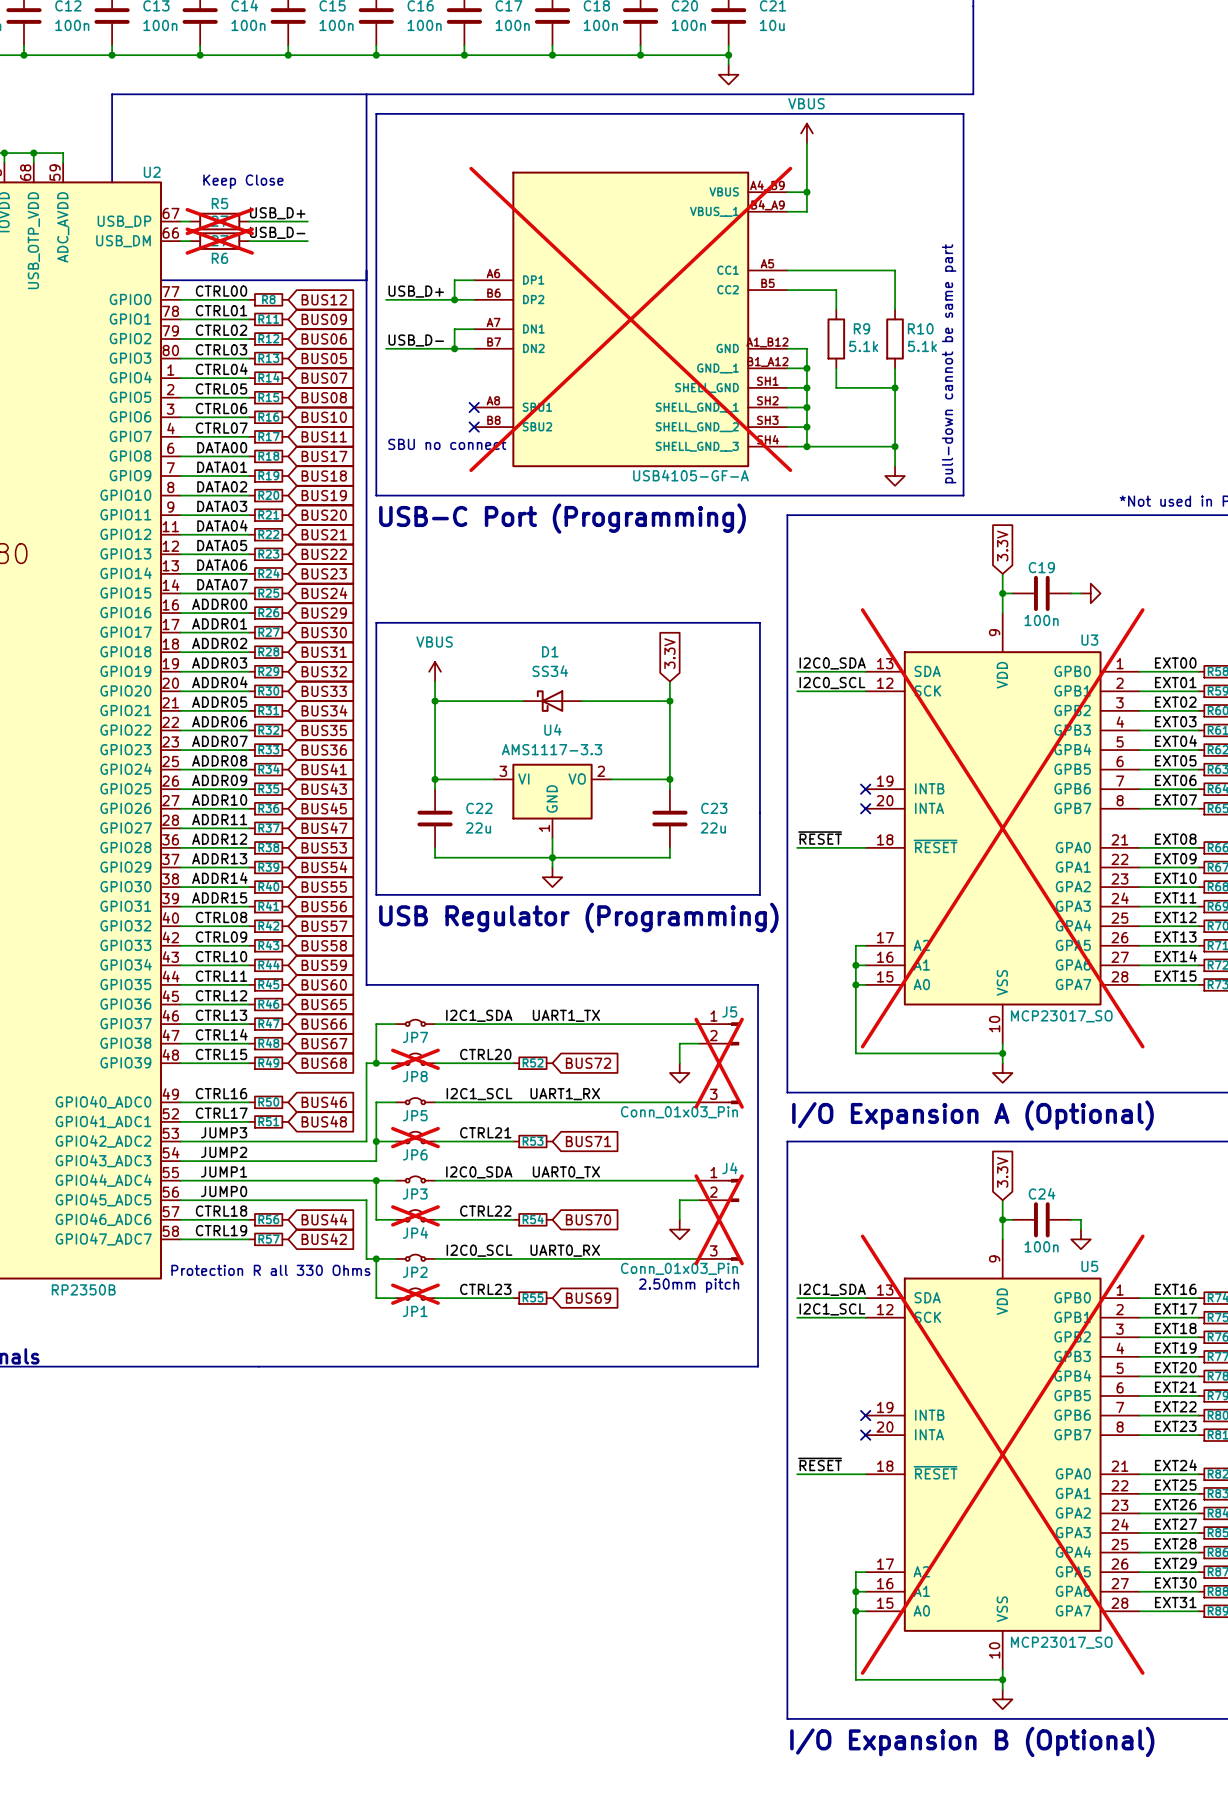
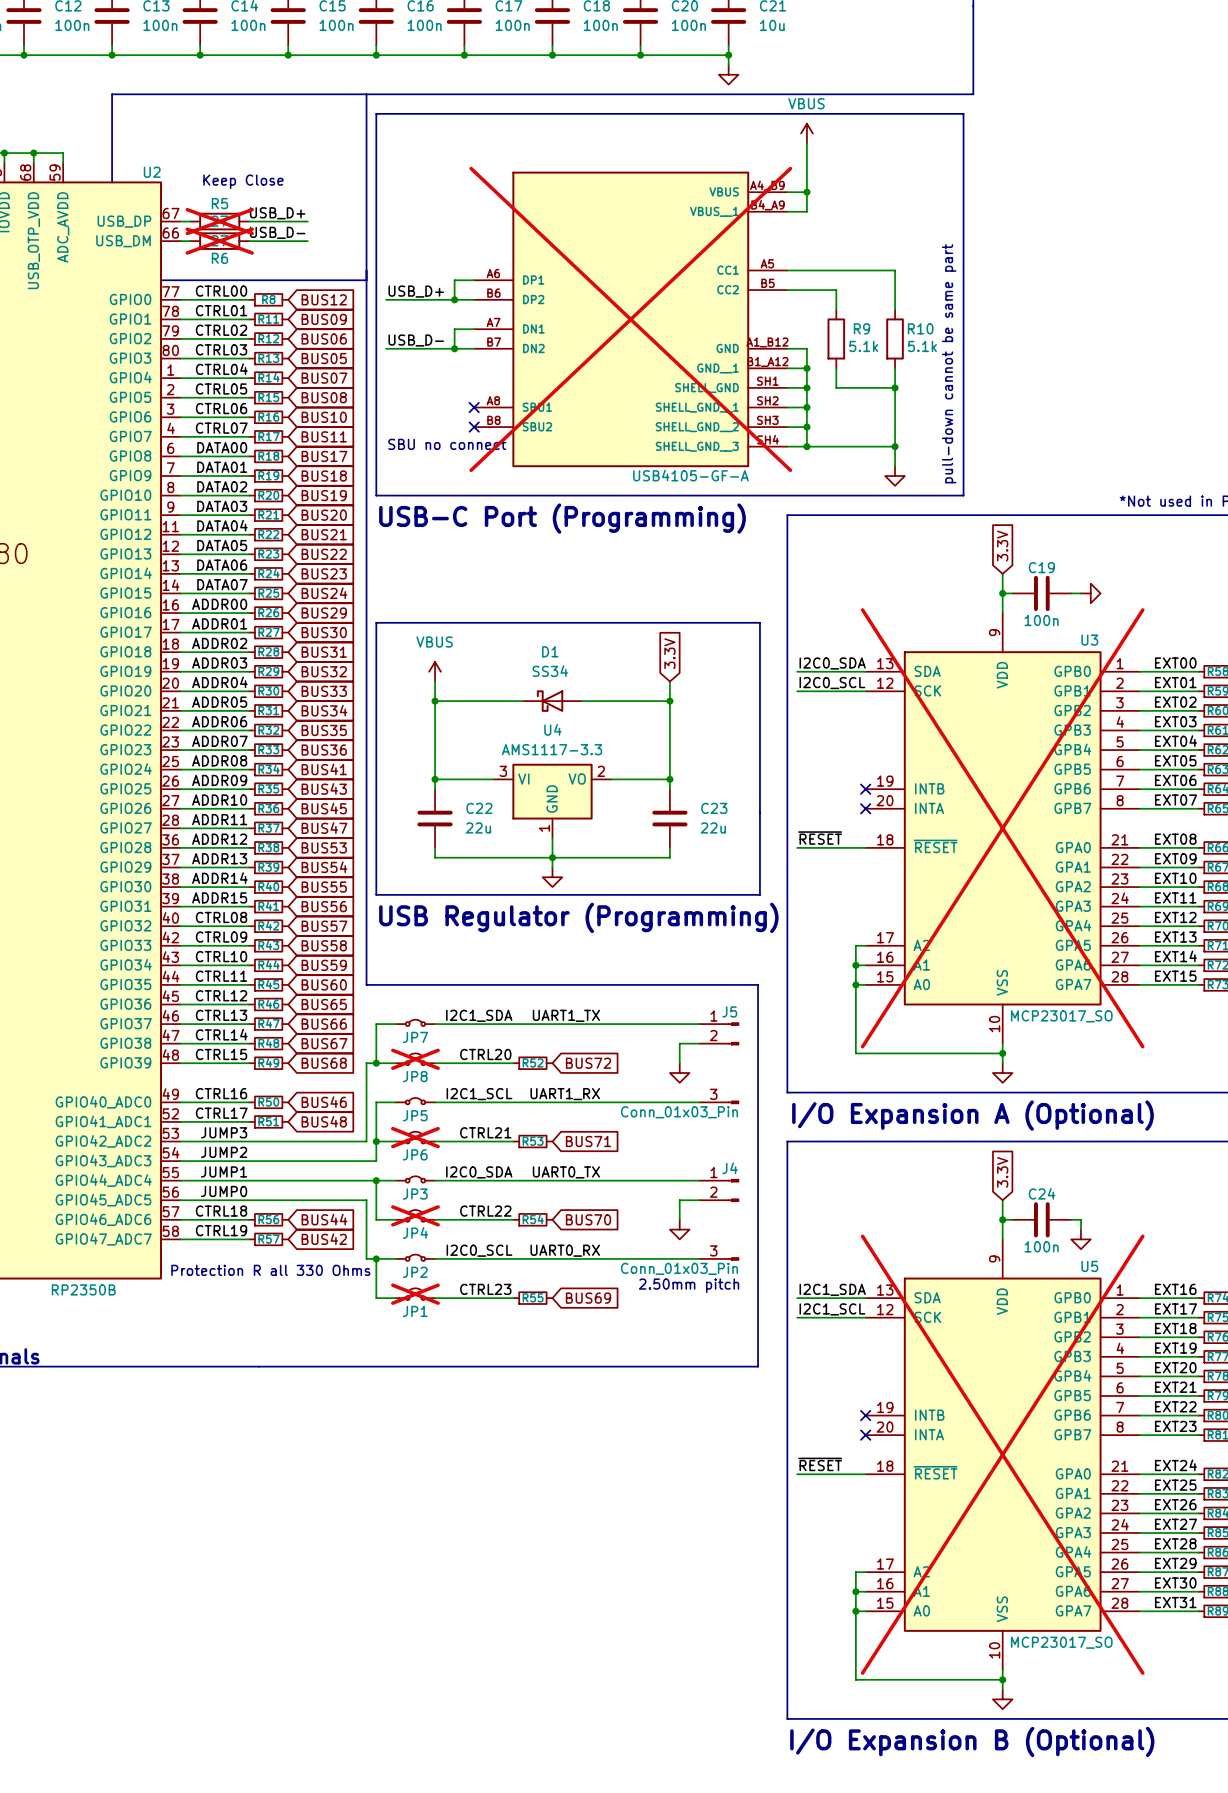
J5 do-not-place cross: (719, 1063) -> none
J4 do-not-place cross: (719, 1219) -> none

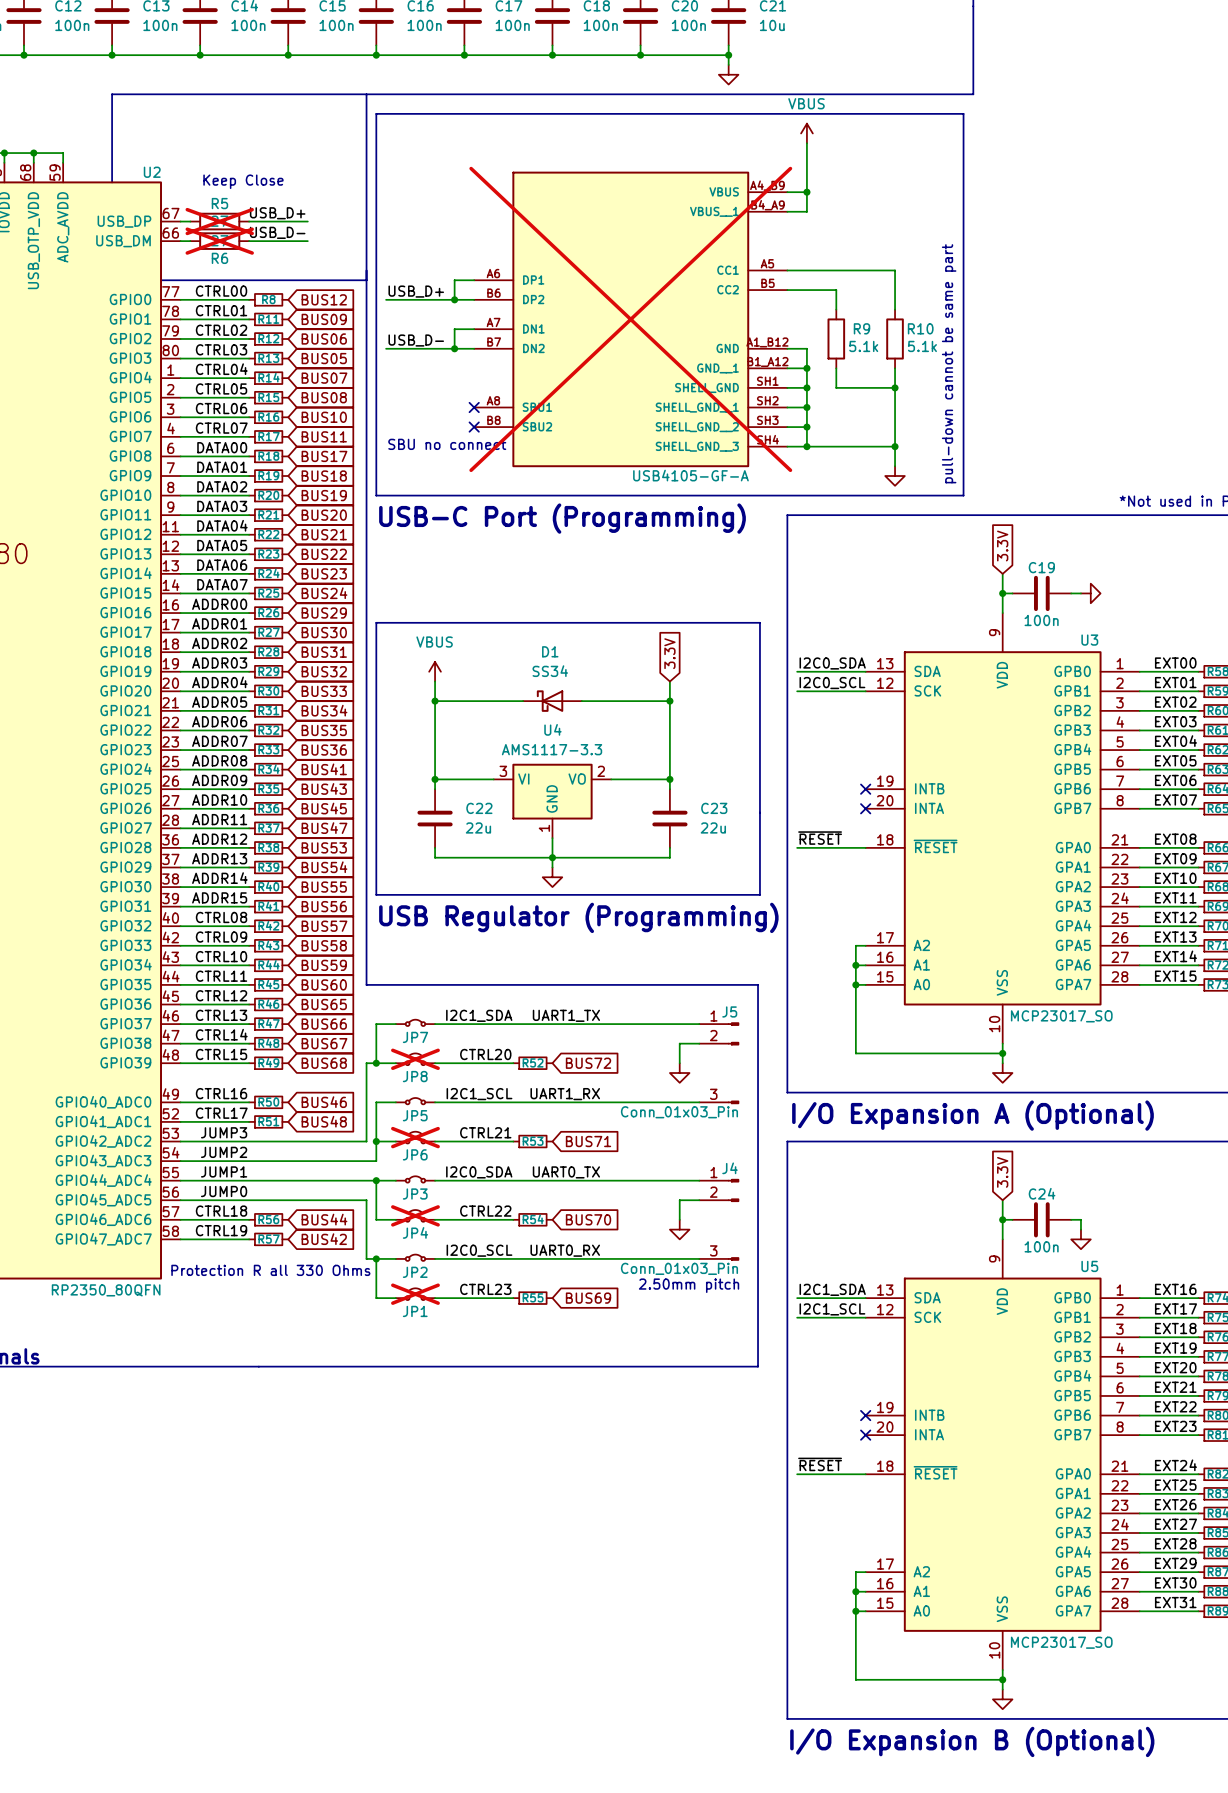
U3 do-not-place cross: (1002, 828) -> none
U2 value: RP2350B (83, 1289) -> RP2350_80QFN (106, 1290)
U5 do-not-place cross: (1002, 1454) -> none

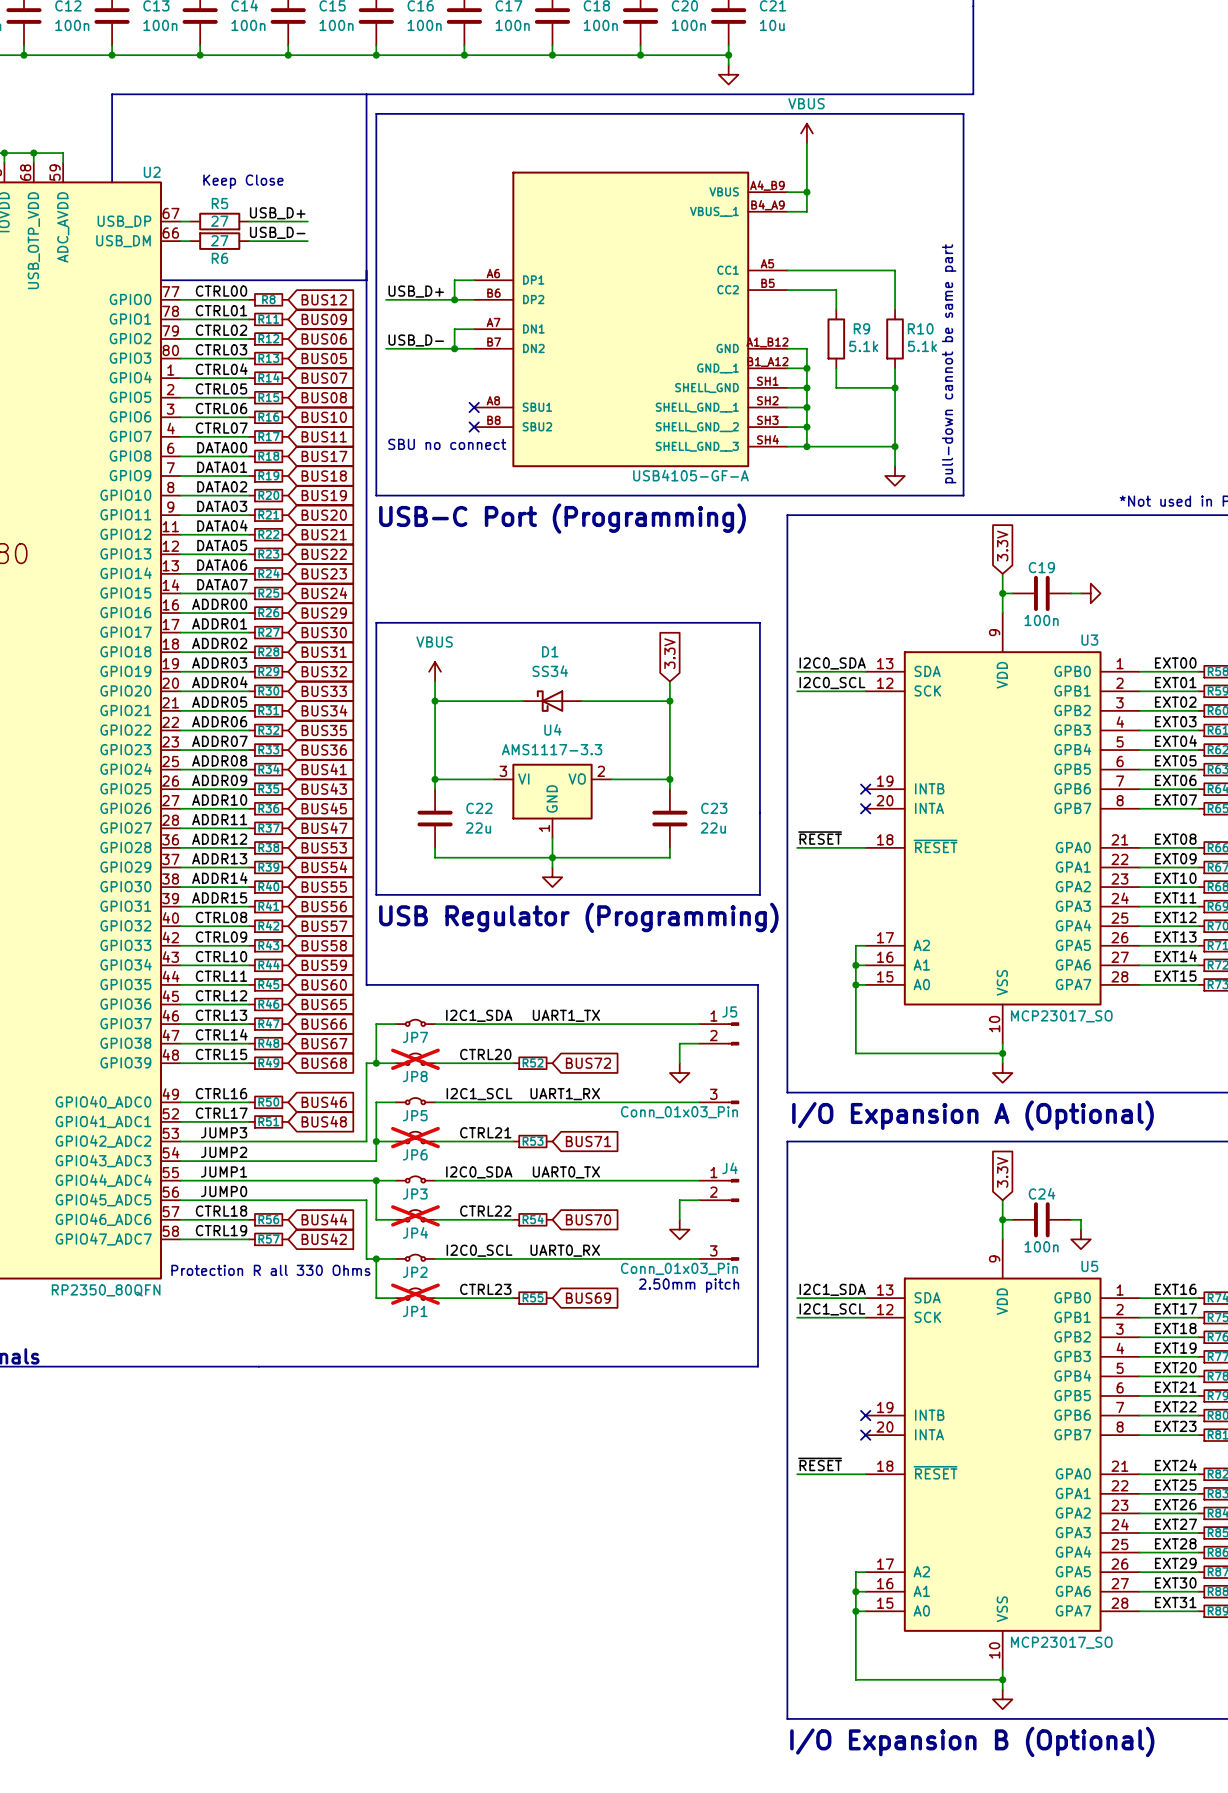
R5 do-not-place cross: (219, 221) -> none
R6 do-not-place cross: (219, 241) -> none
part do-not-place cross: (630, 319) -> none

